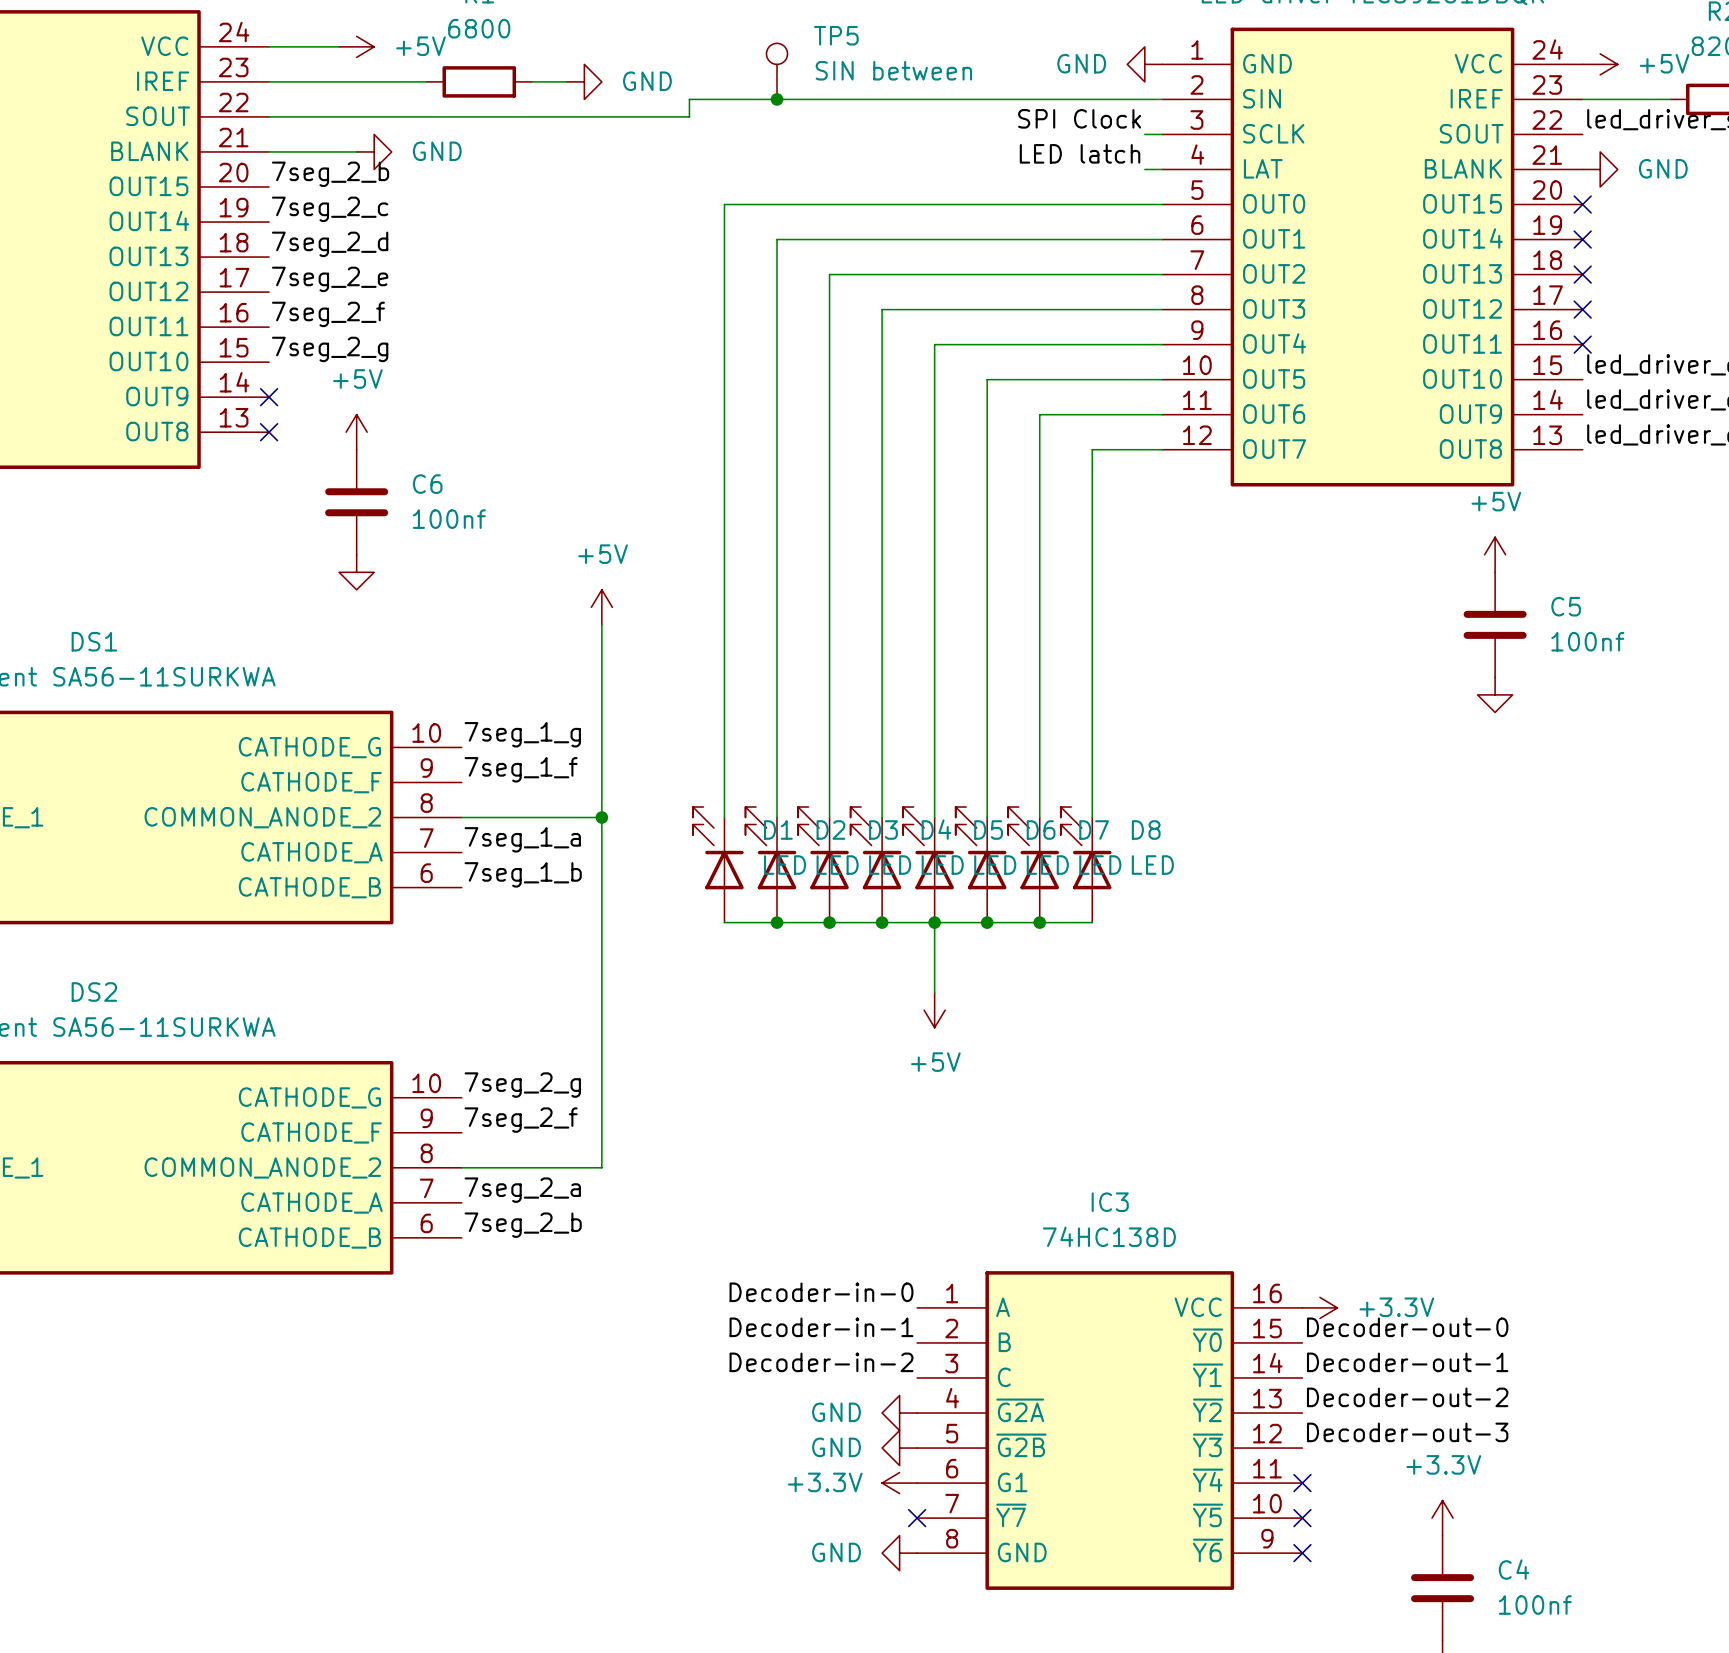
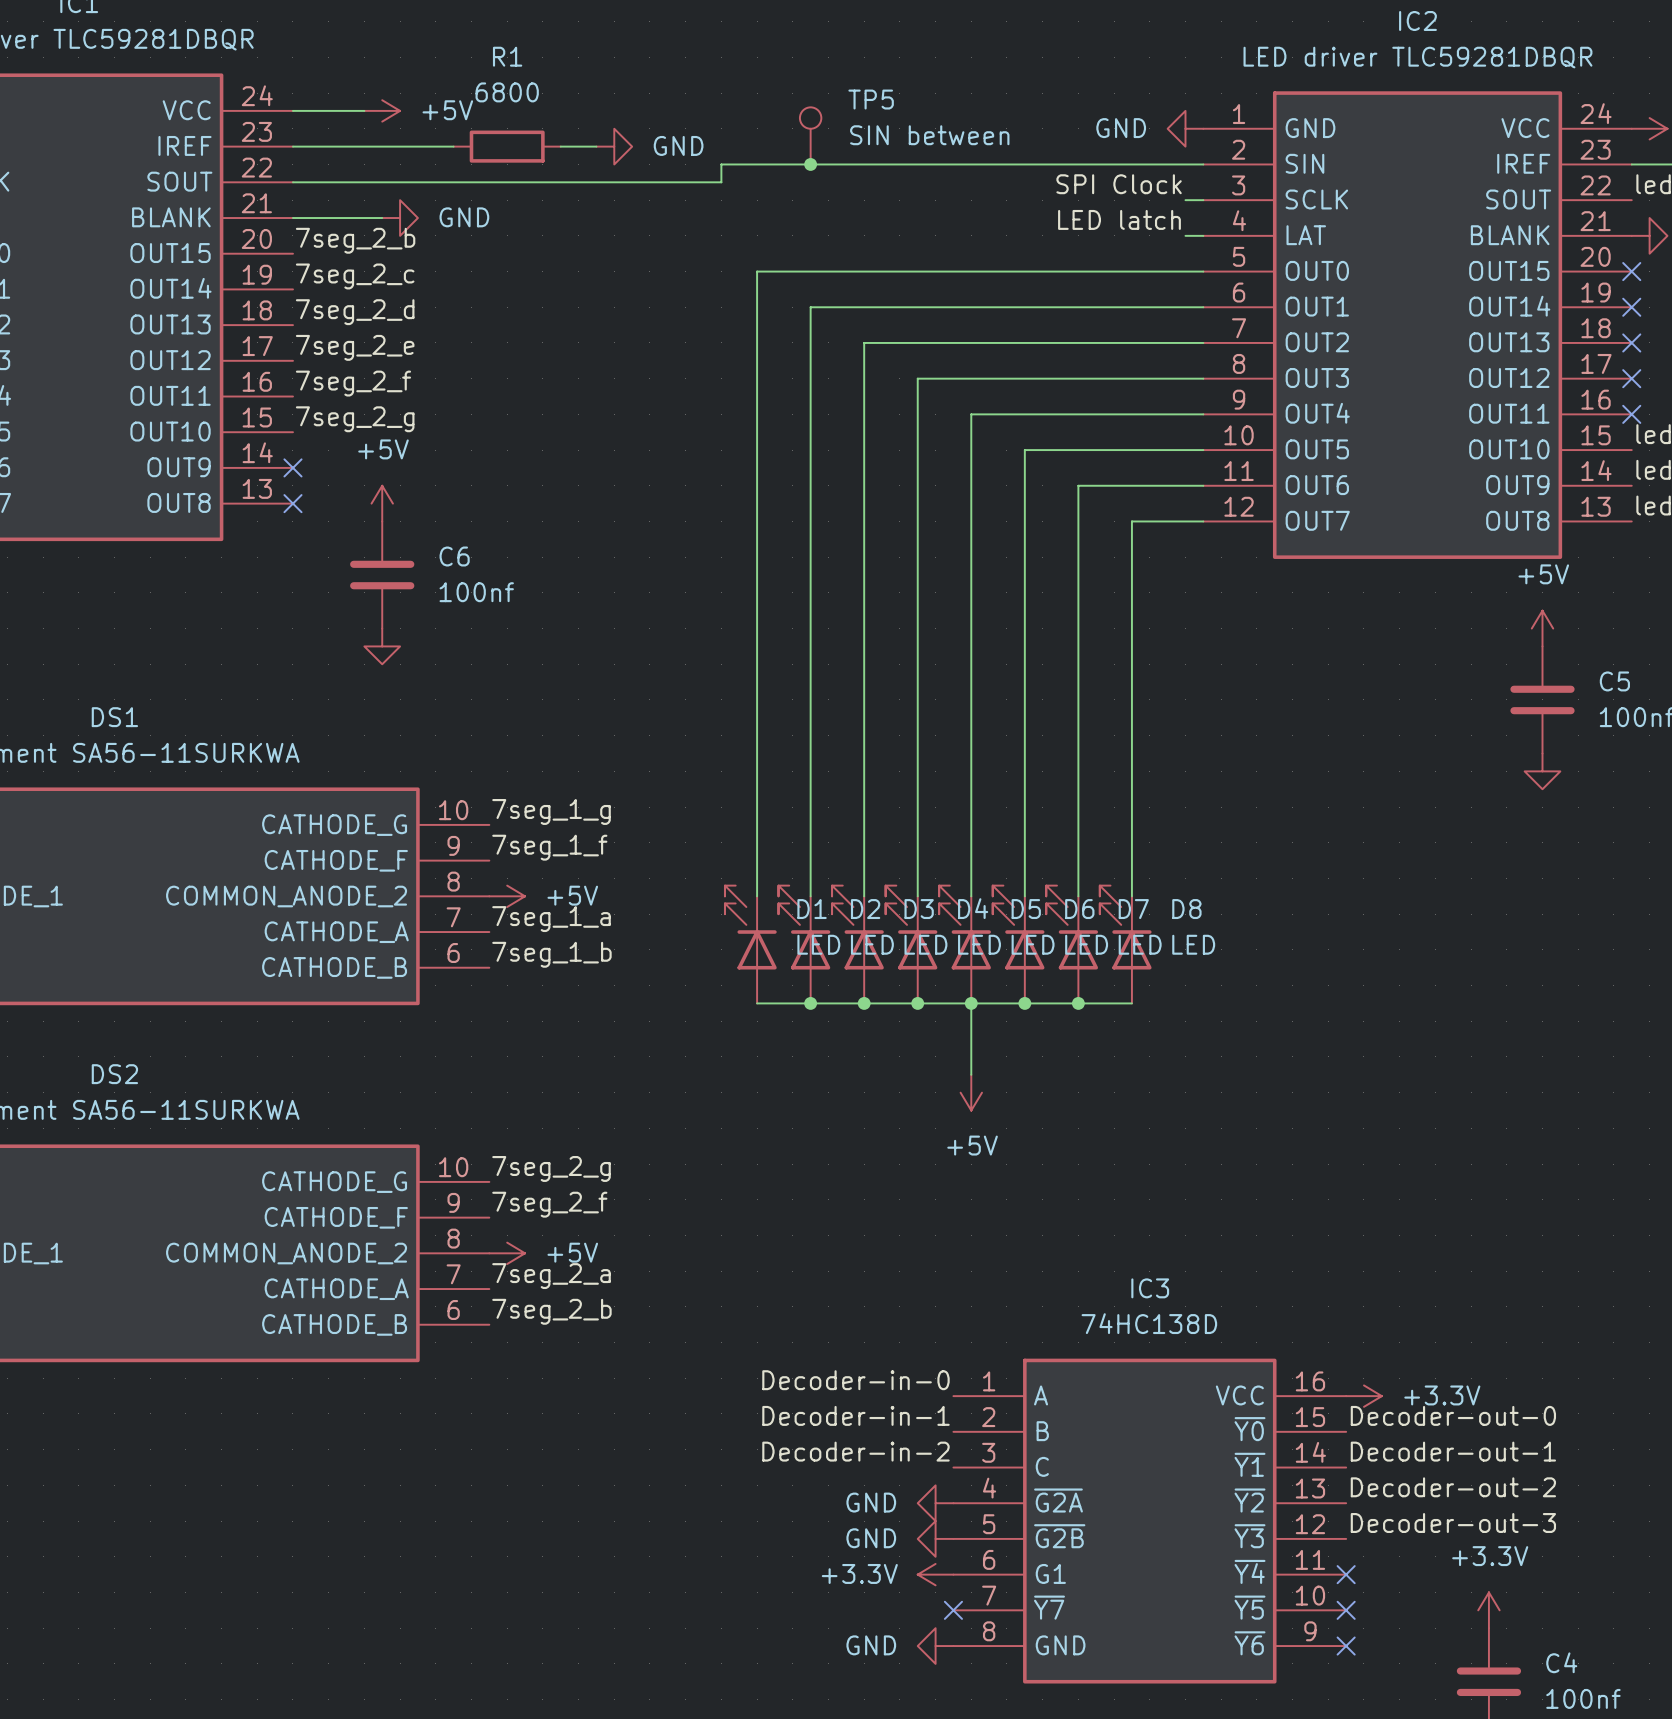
power symbol rotation: 0° (601, 607) -> 90° clockwise (507, 896)
power symbol position: +5V (601, 607) -> +5V (507, 896)
wire: (601, 624) (601, 1167) (461, 1167) -> none
wire: (461, 817) (601, 817) -> none
junction: (601, 817) -> none
power symbol: none -> +5V (507, 1253)

